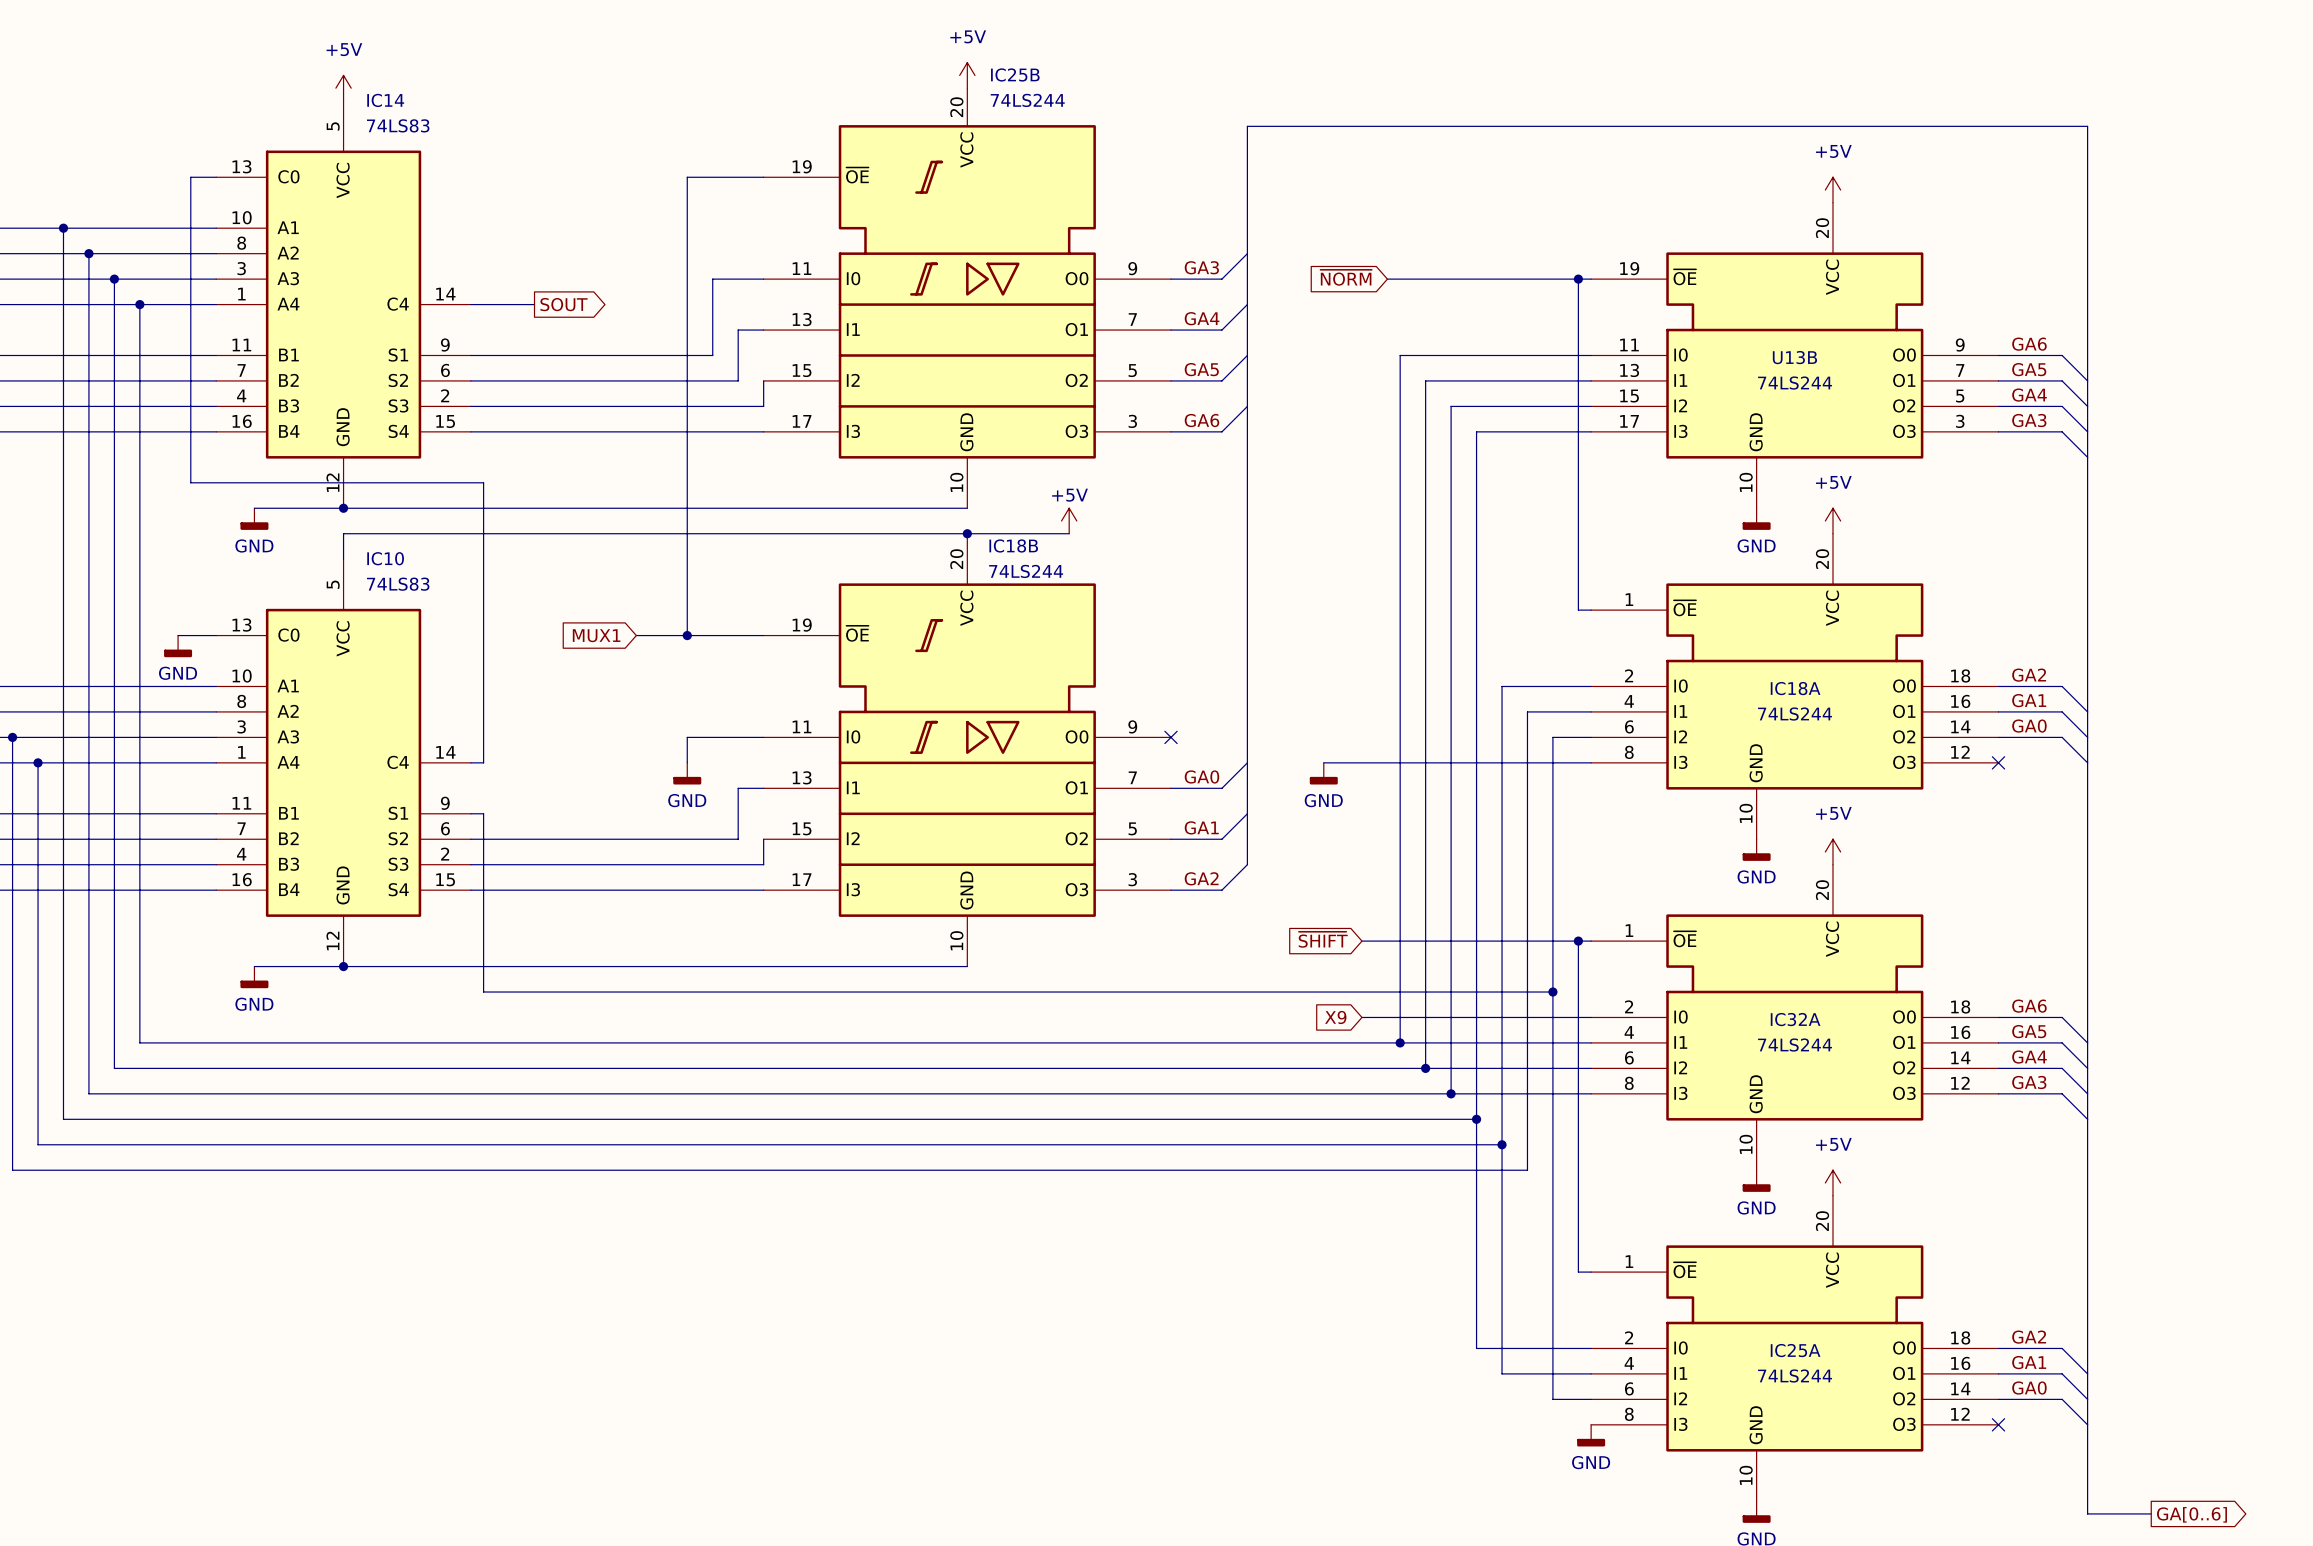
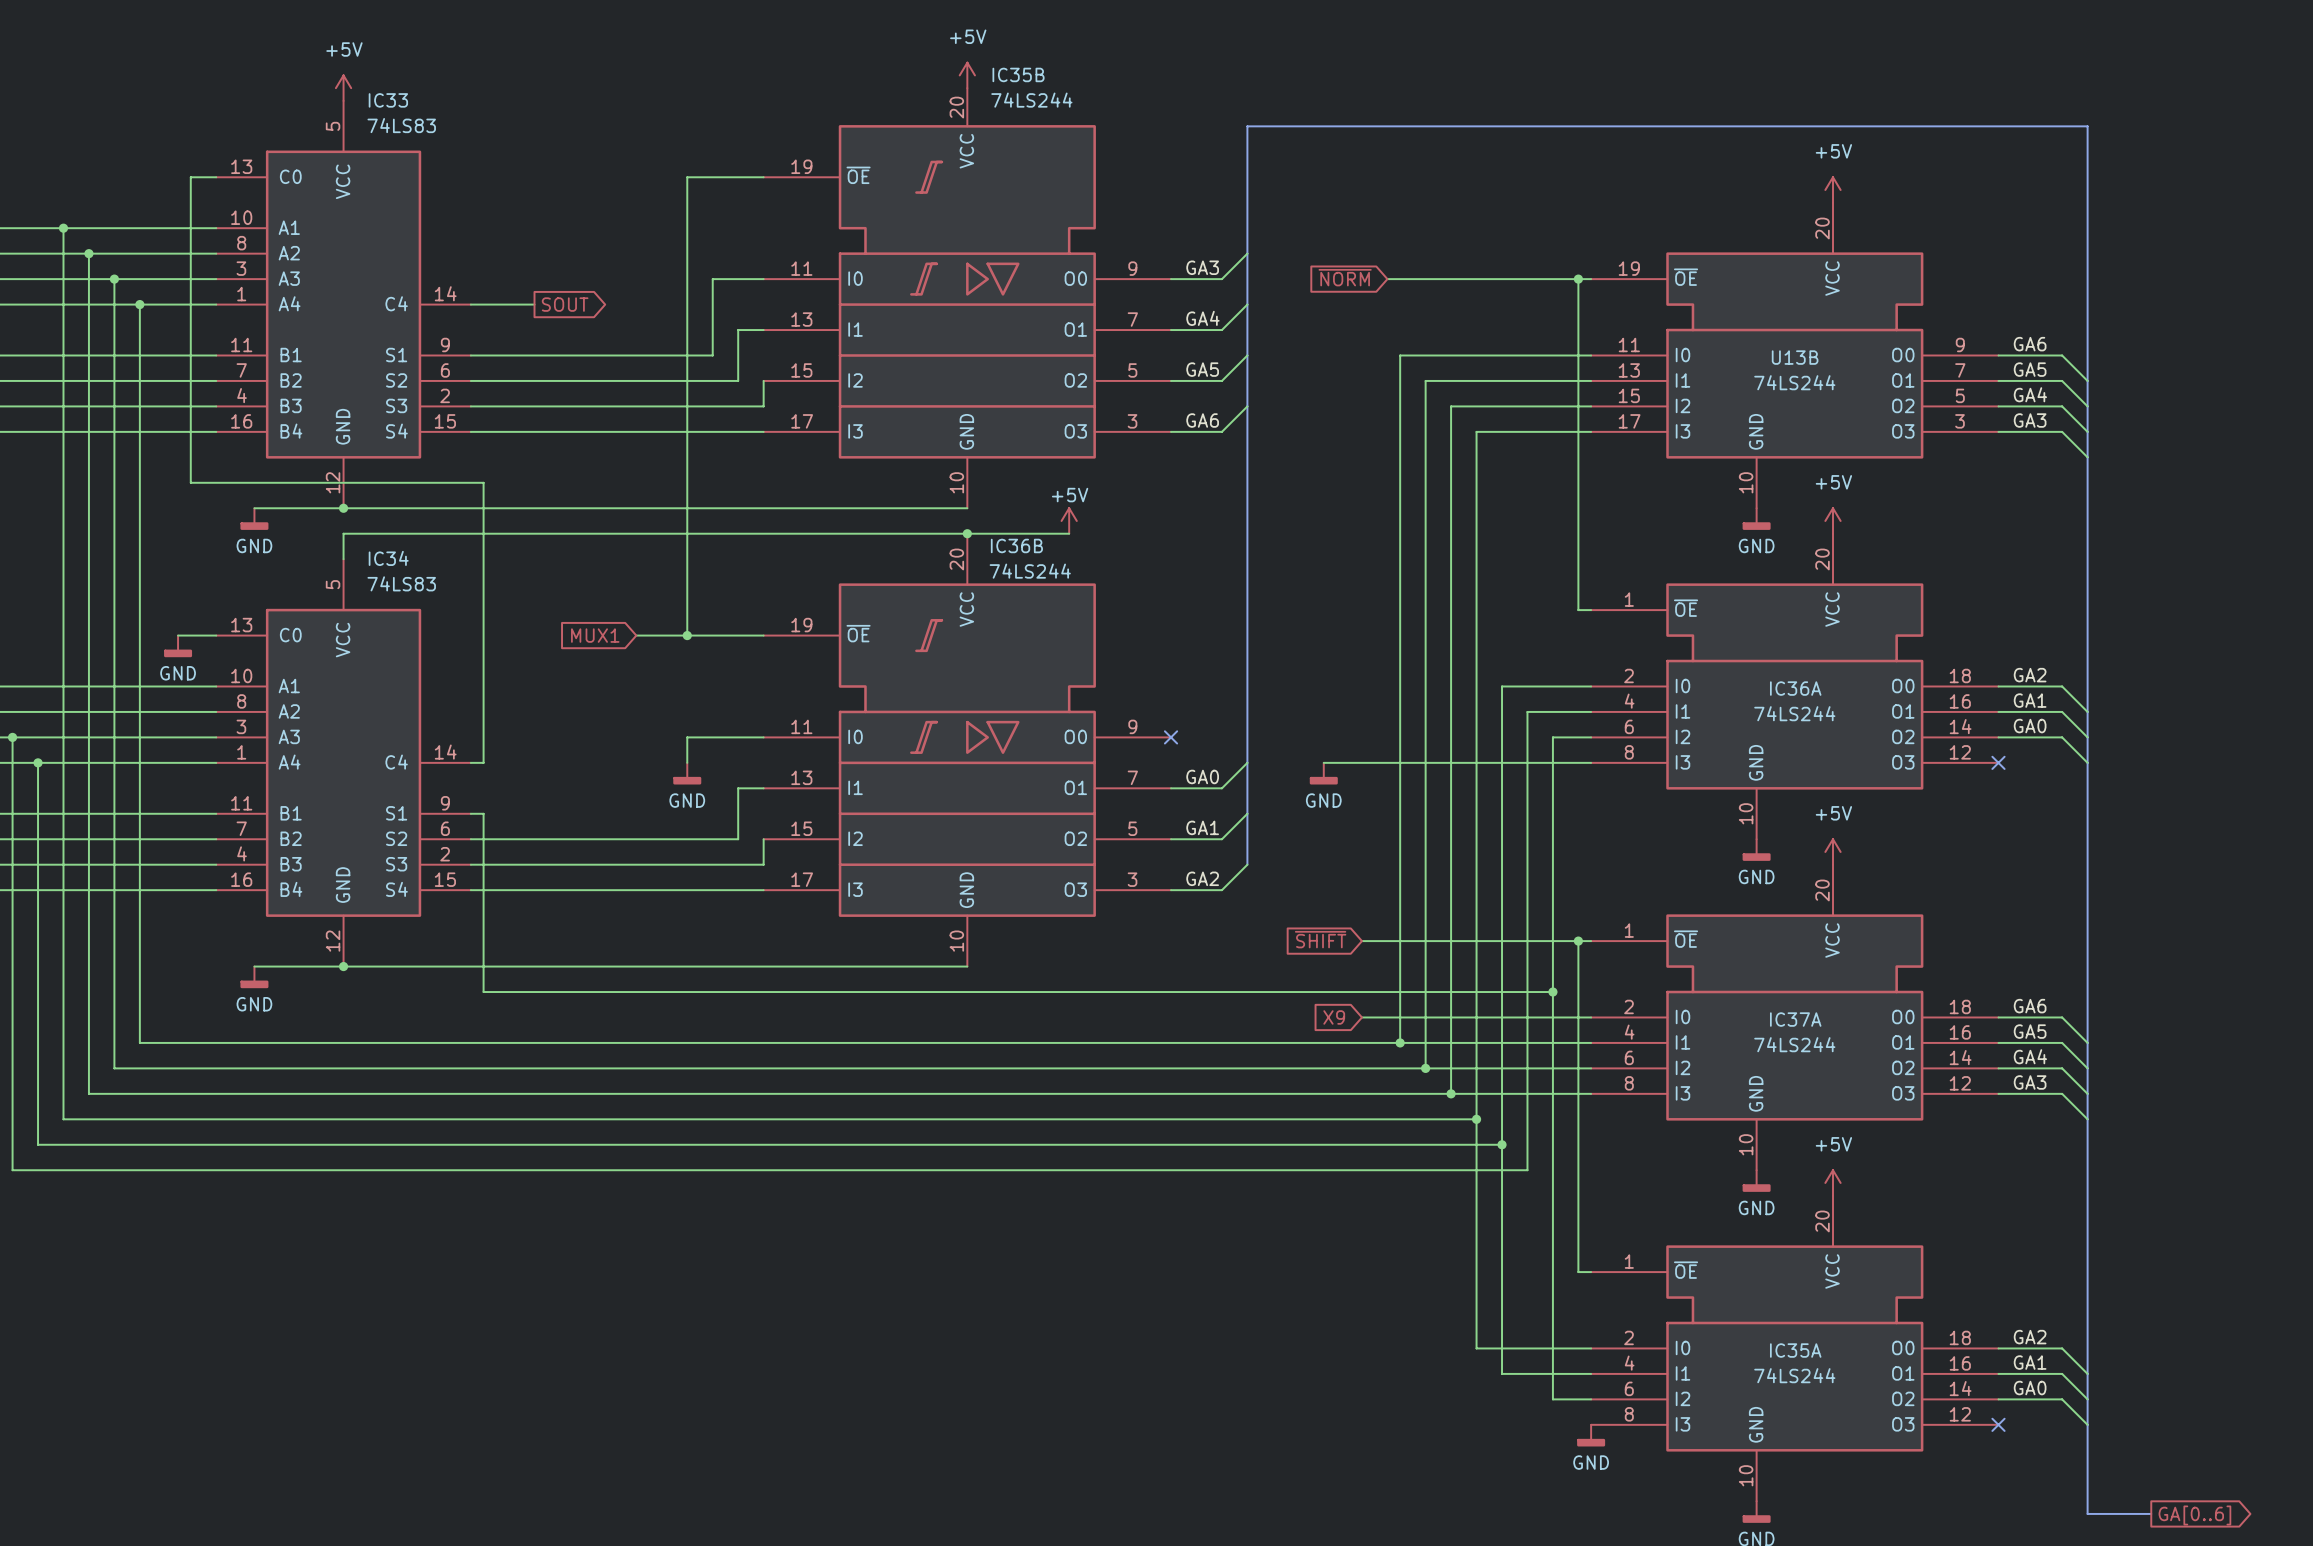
IC25B name: IC25B (1015, 74) -> IC35B (1018, 74)
IC14 name: IC14 (385, 100) -> IC33 (388, 100)
IC18B name: IC18B (1013, 545) -> IC36B (1016, 545)
IC10 name: IC10 (385, 558) -> IC34 (388, 558)
IC18A name: IC18A (1795, 688) -> IC36A (1795, 688)
IC32A name: IC32A (1795, 1019) -> IC37A (1795, 1019)
IC25A name: IC25A (1795, 1350) -> IC35A (1795, 1350)

